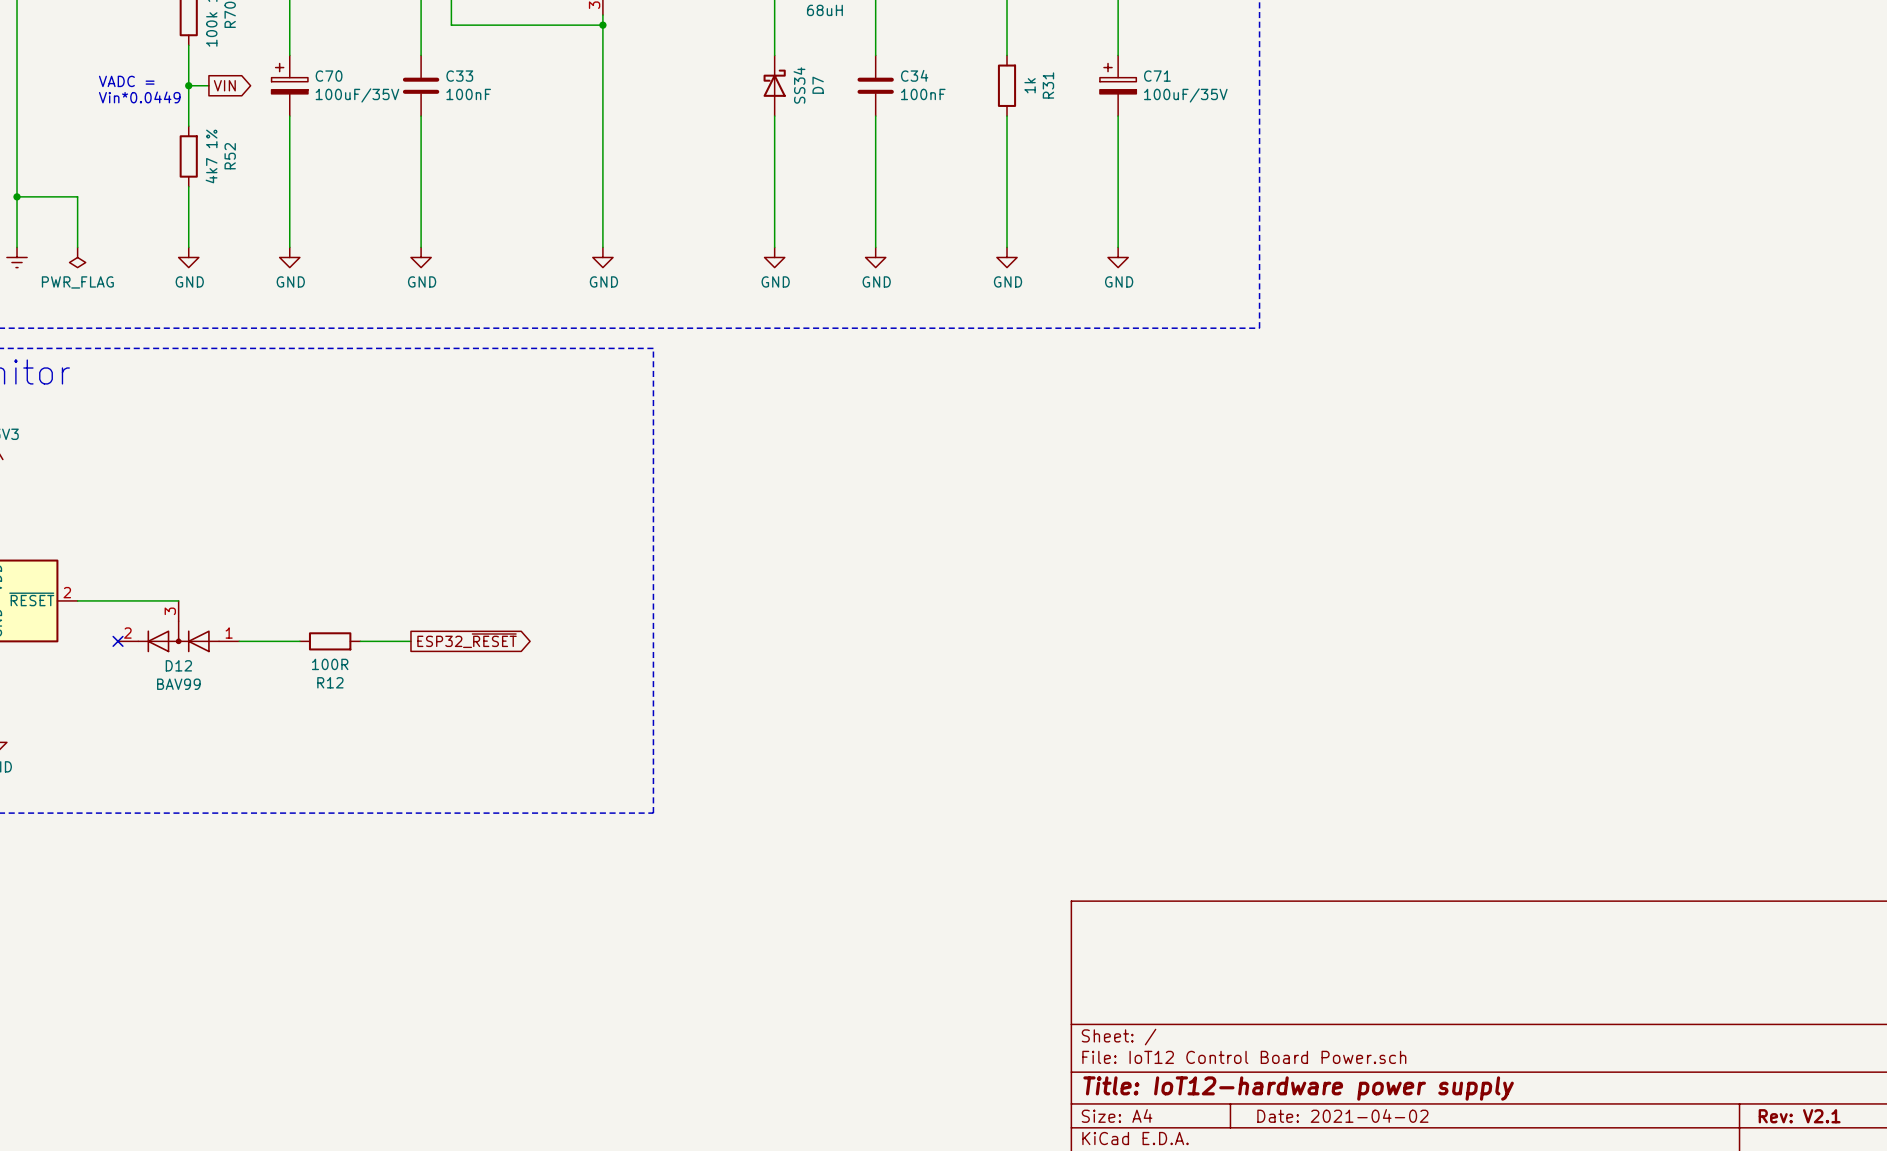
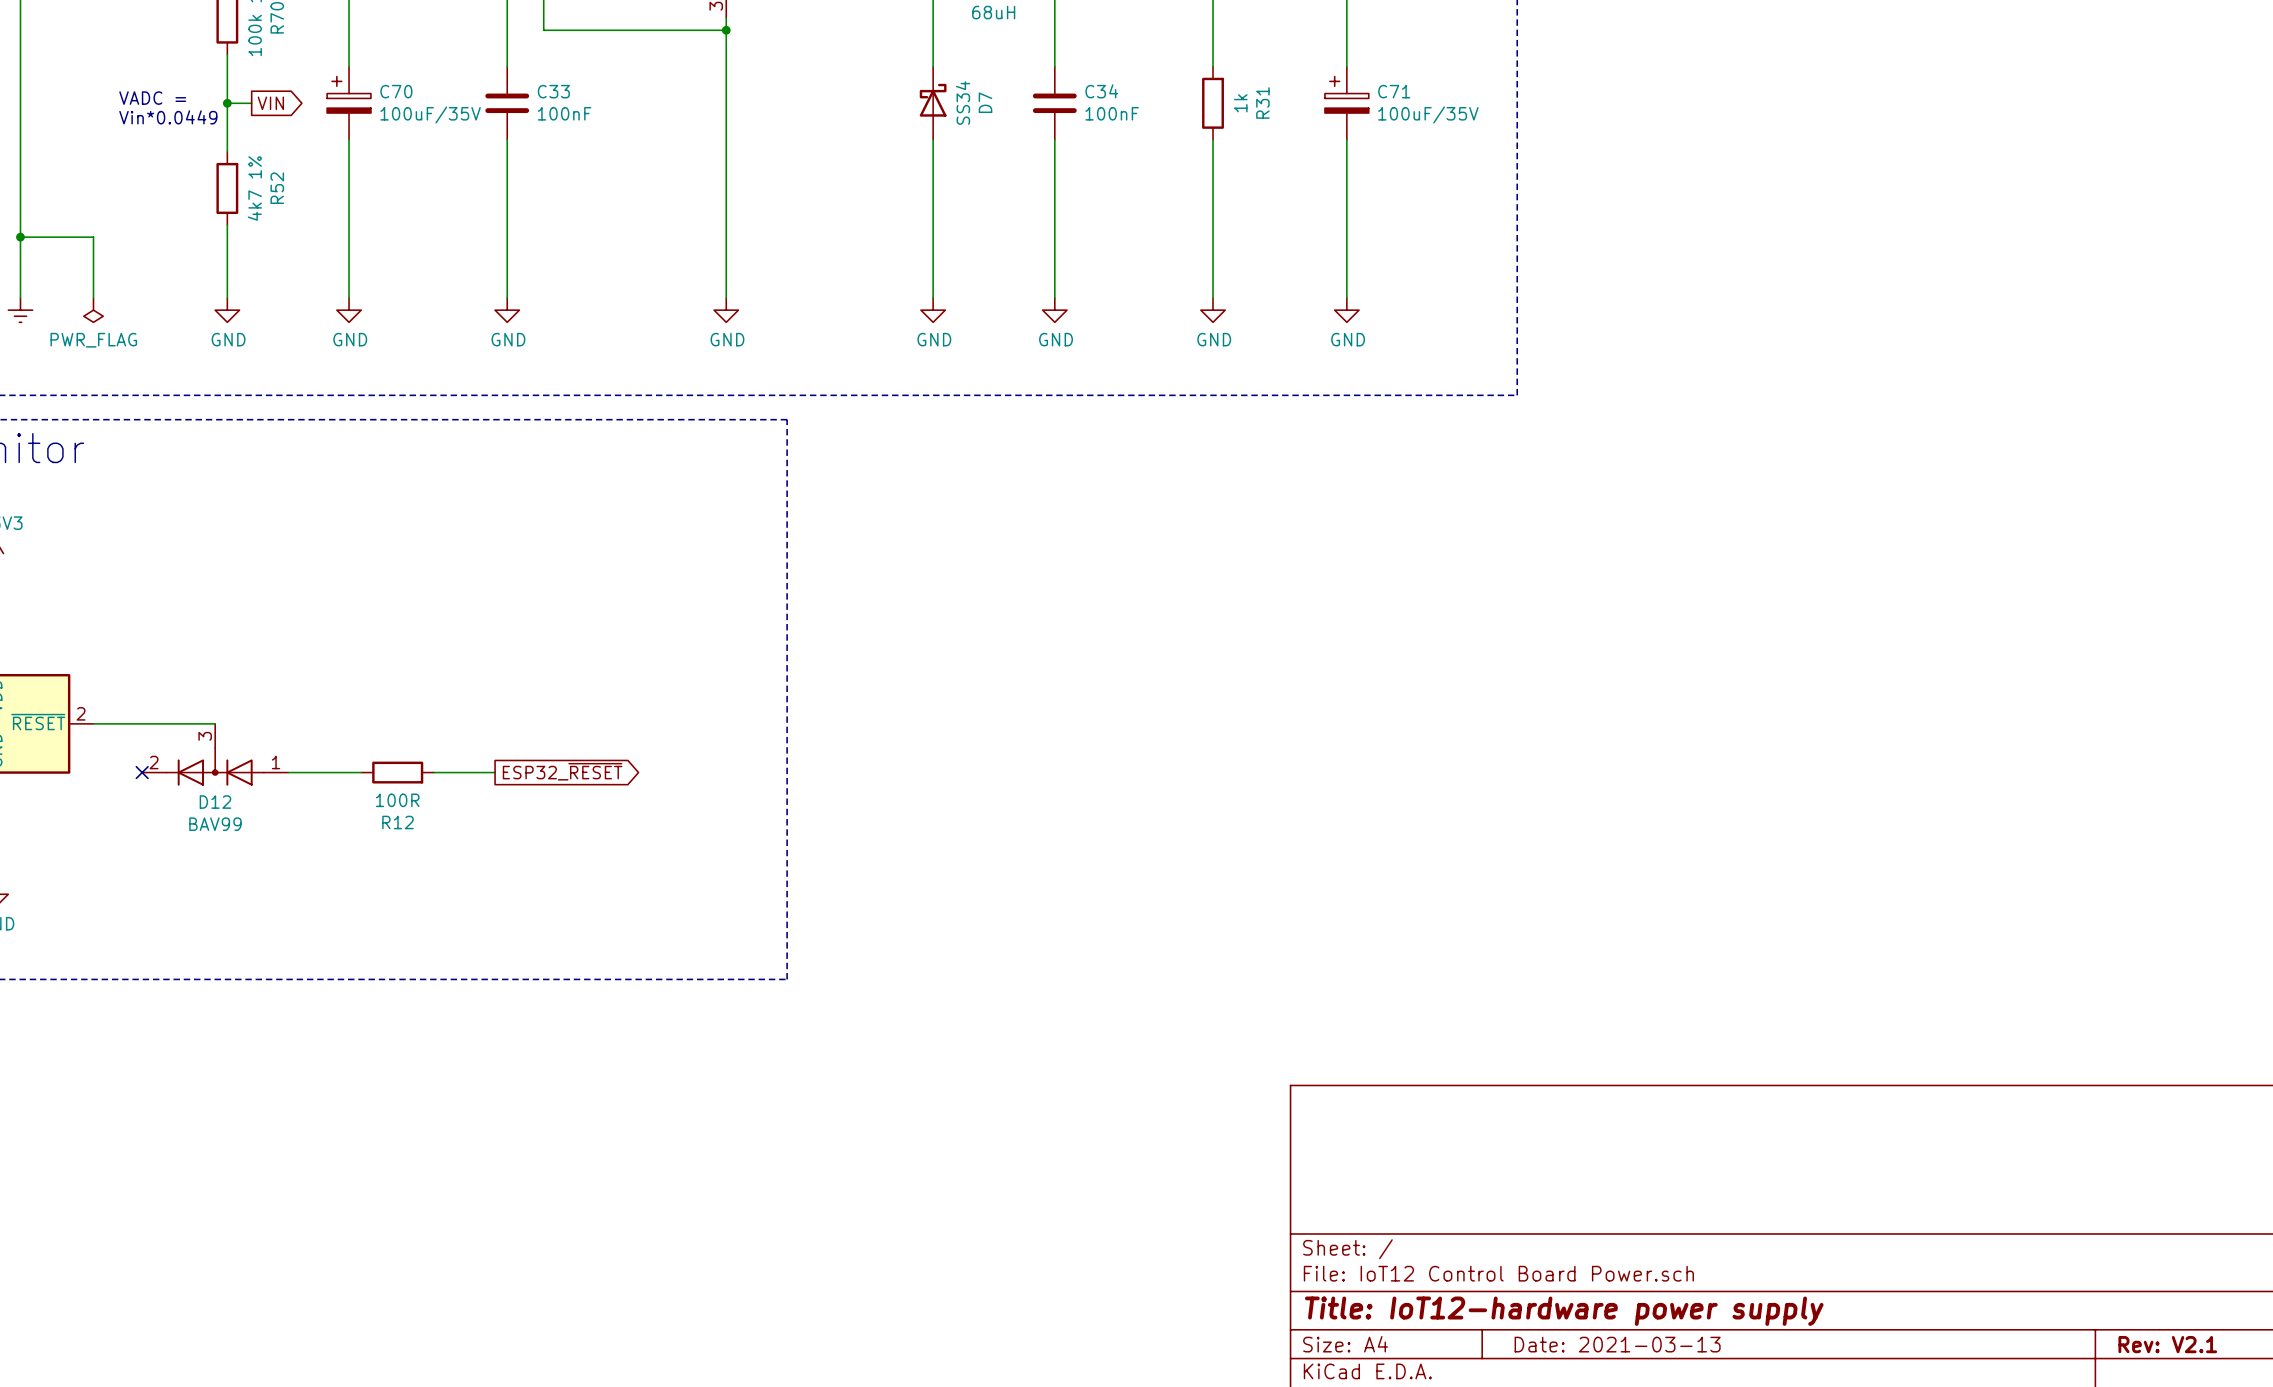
title block: Date: 2021-04-02 (1342, 1115) -> Date: 2021-03-13 (1617, 1344)

